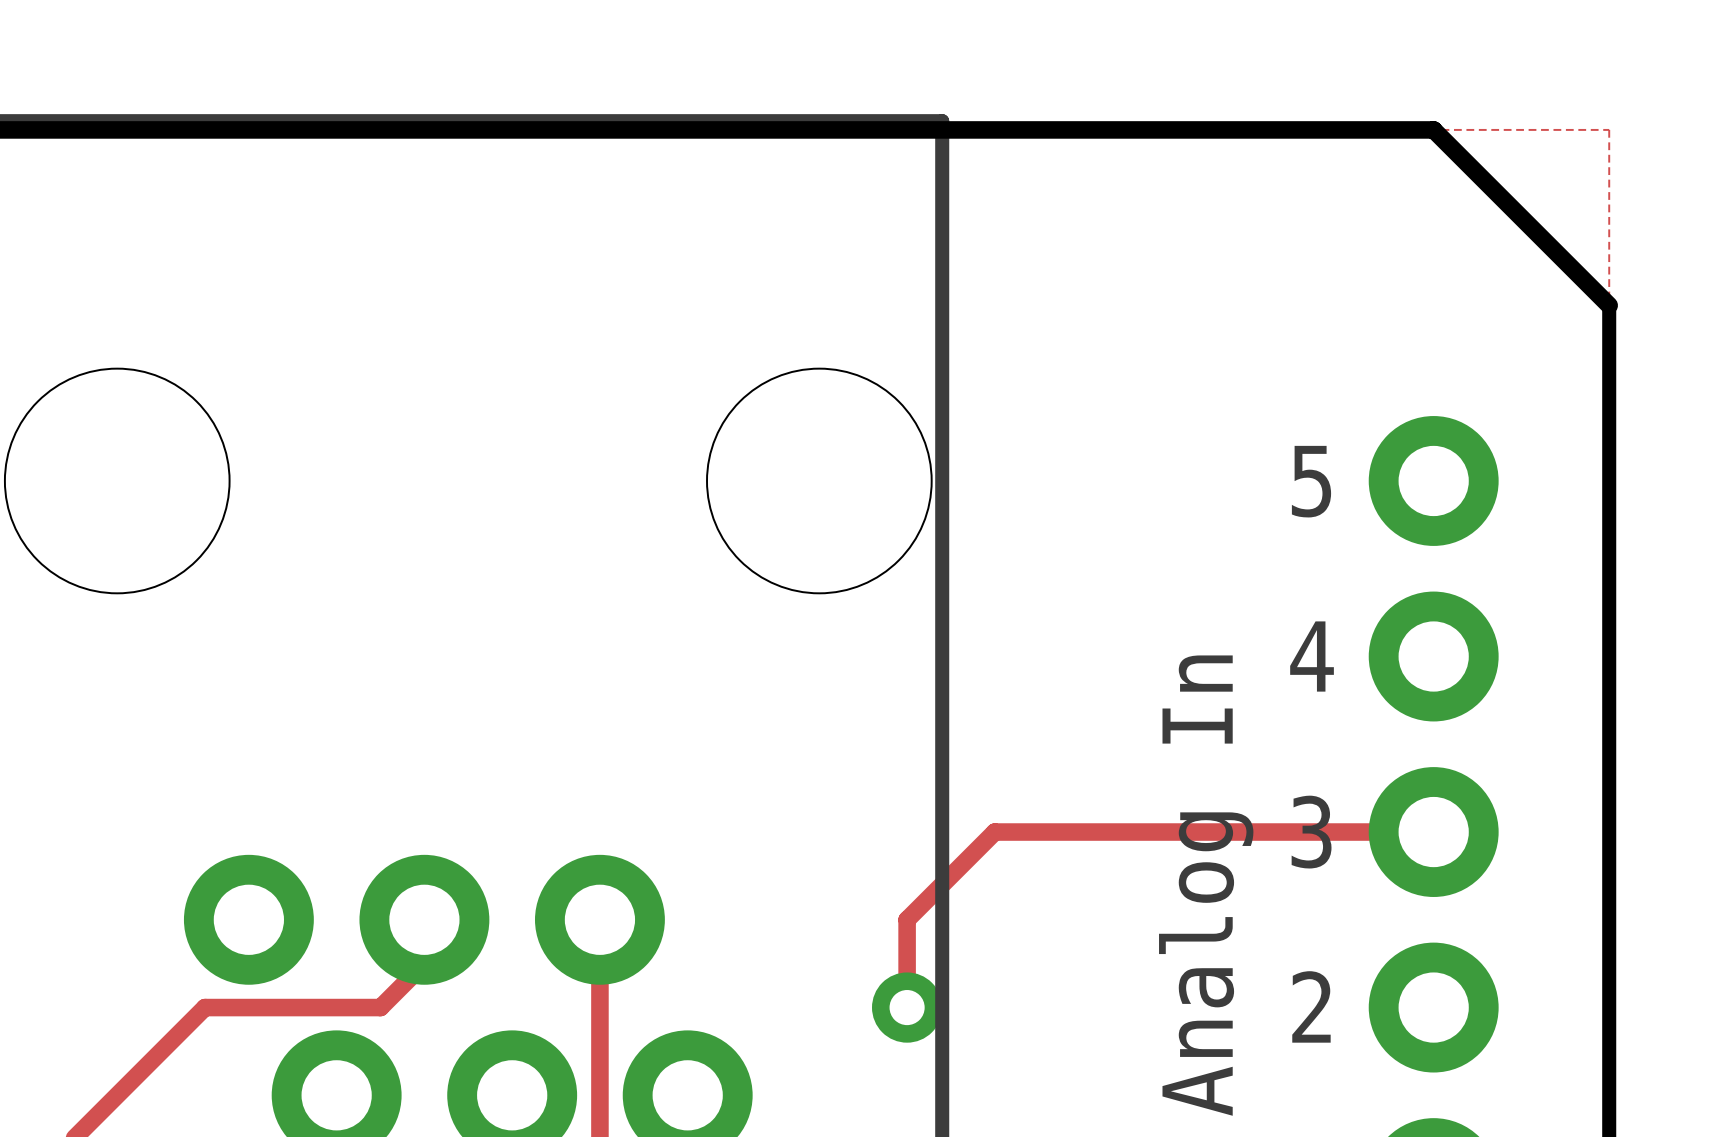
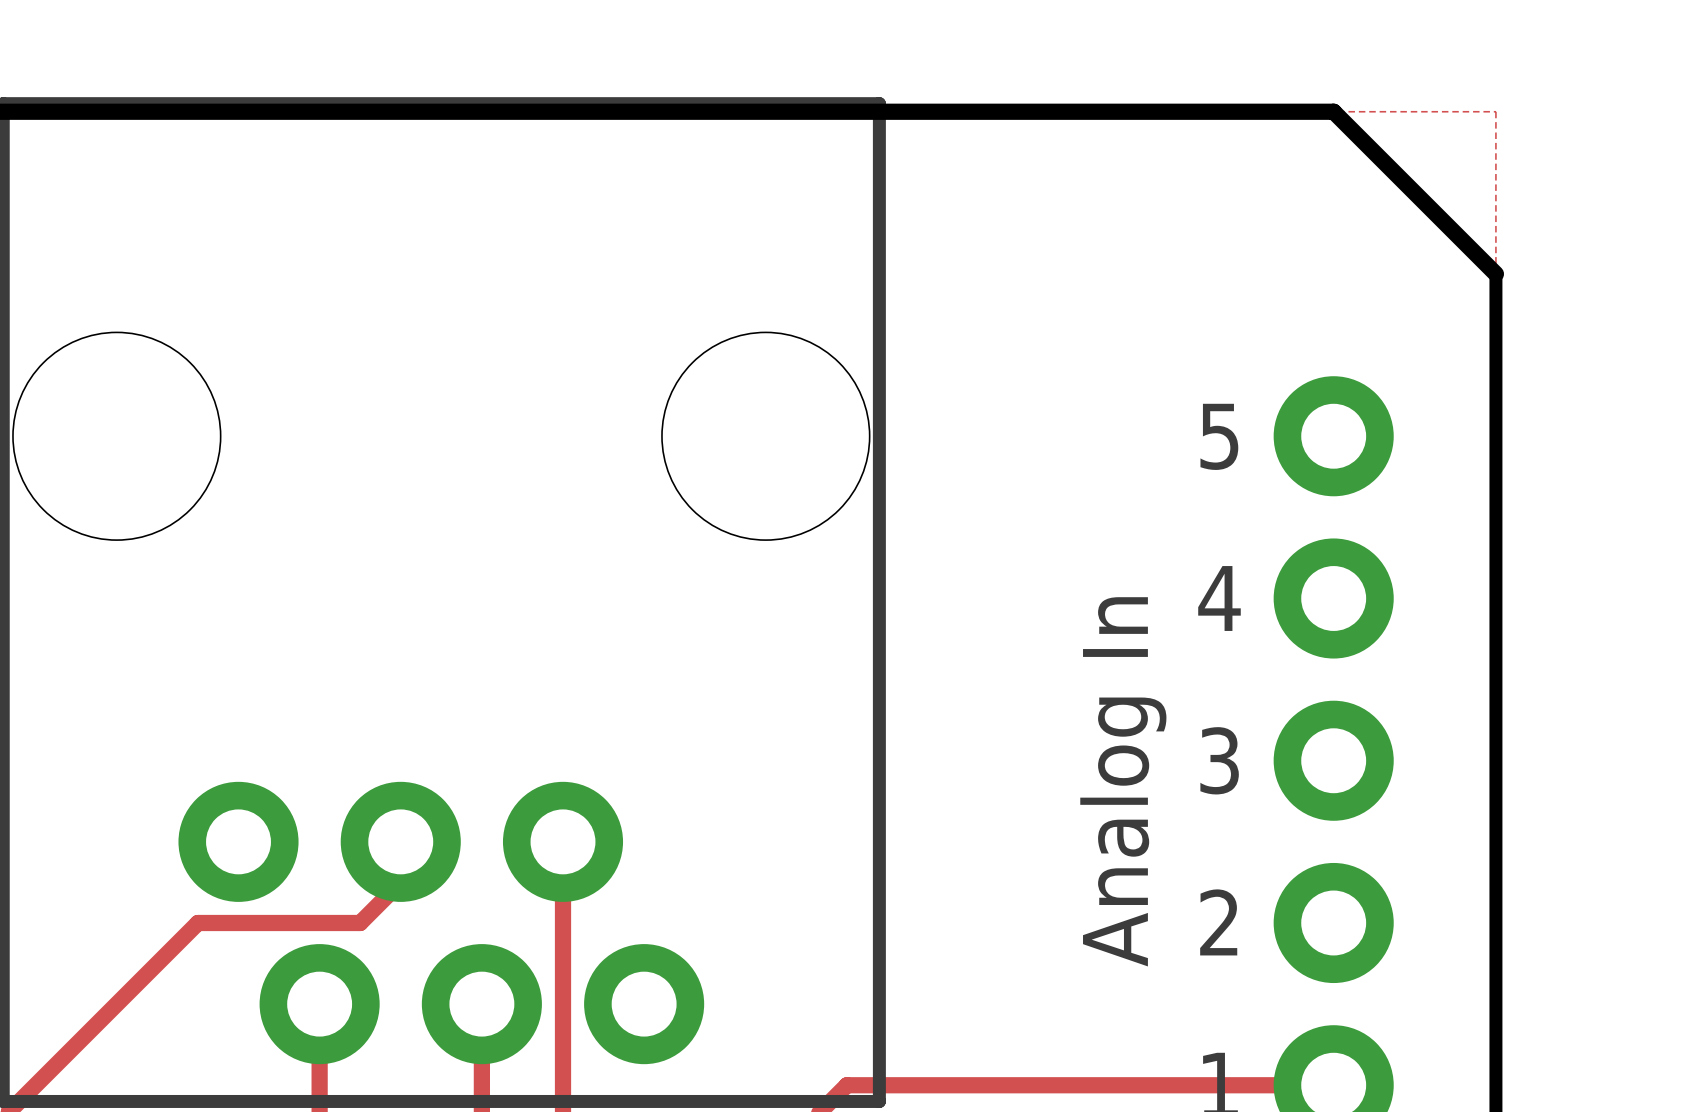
track: (1433, 832) (994, 832) (907, 919) (907, 1007) -> none
via: (907, 1007) -> none

